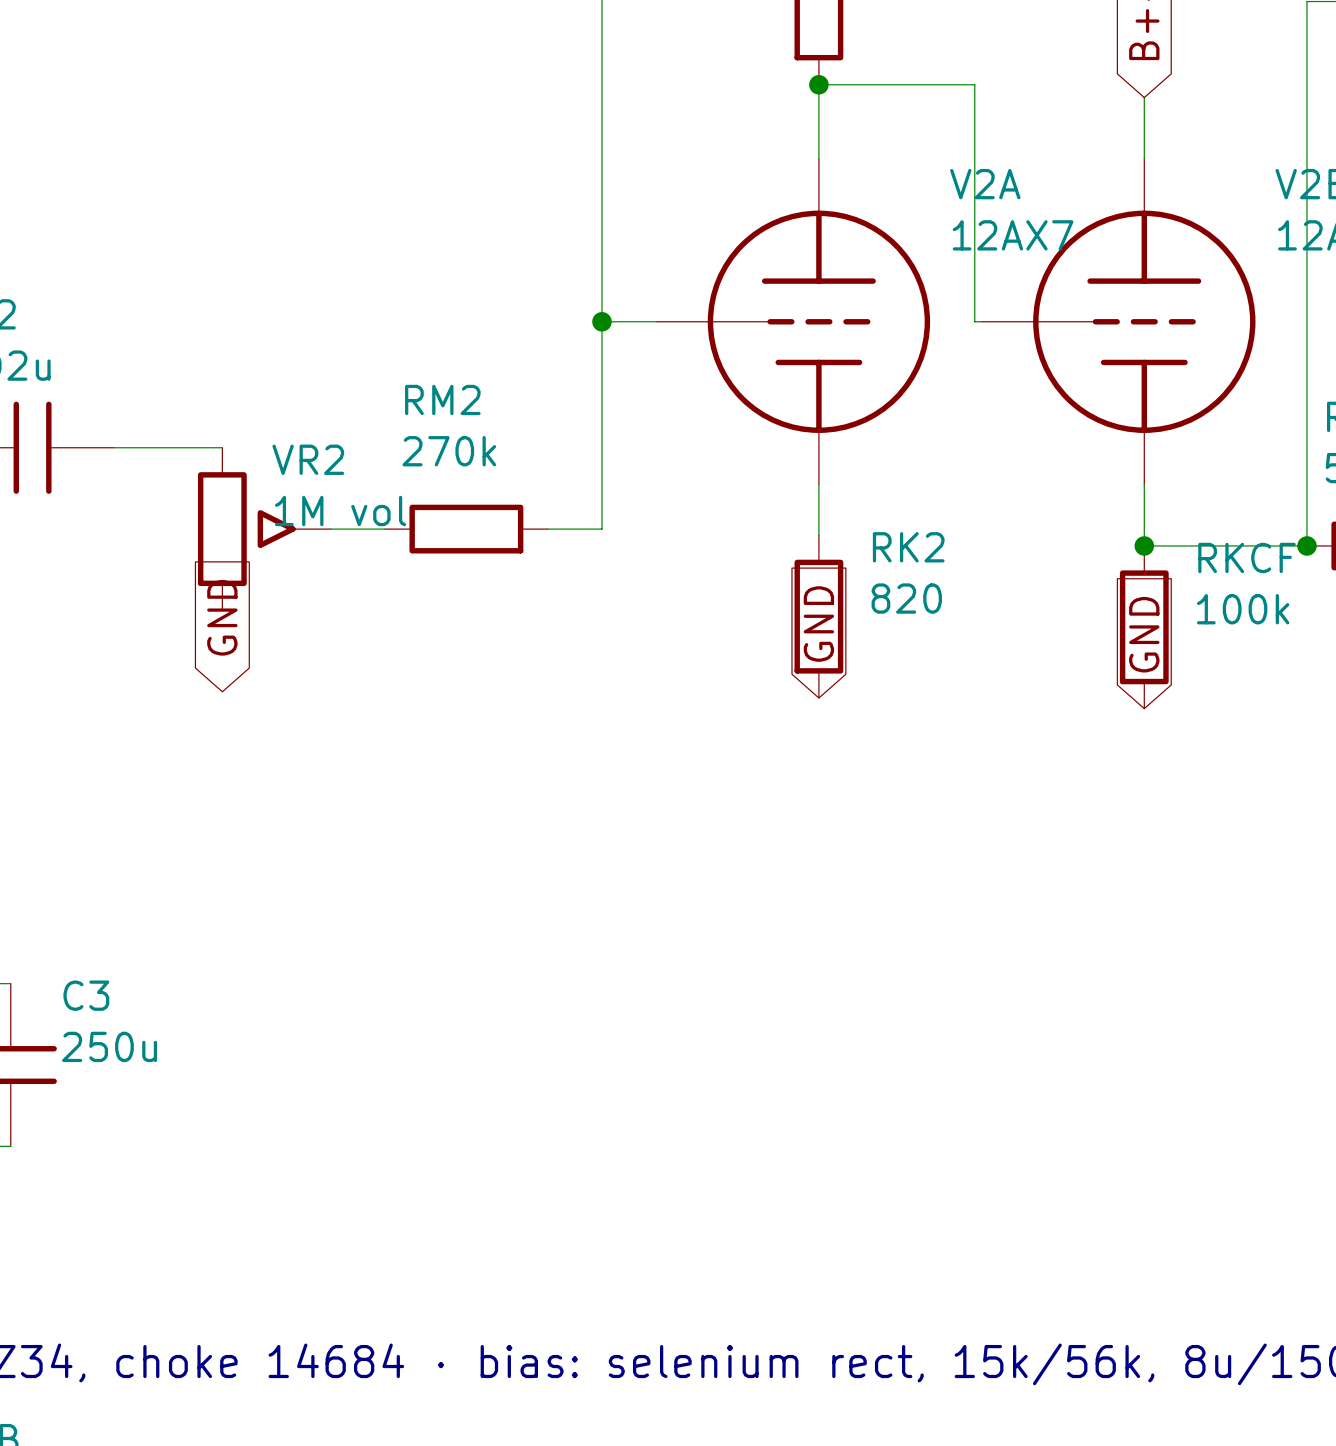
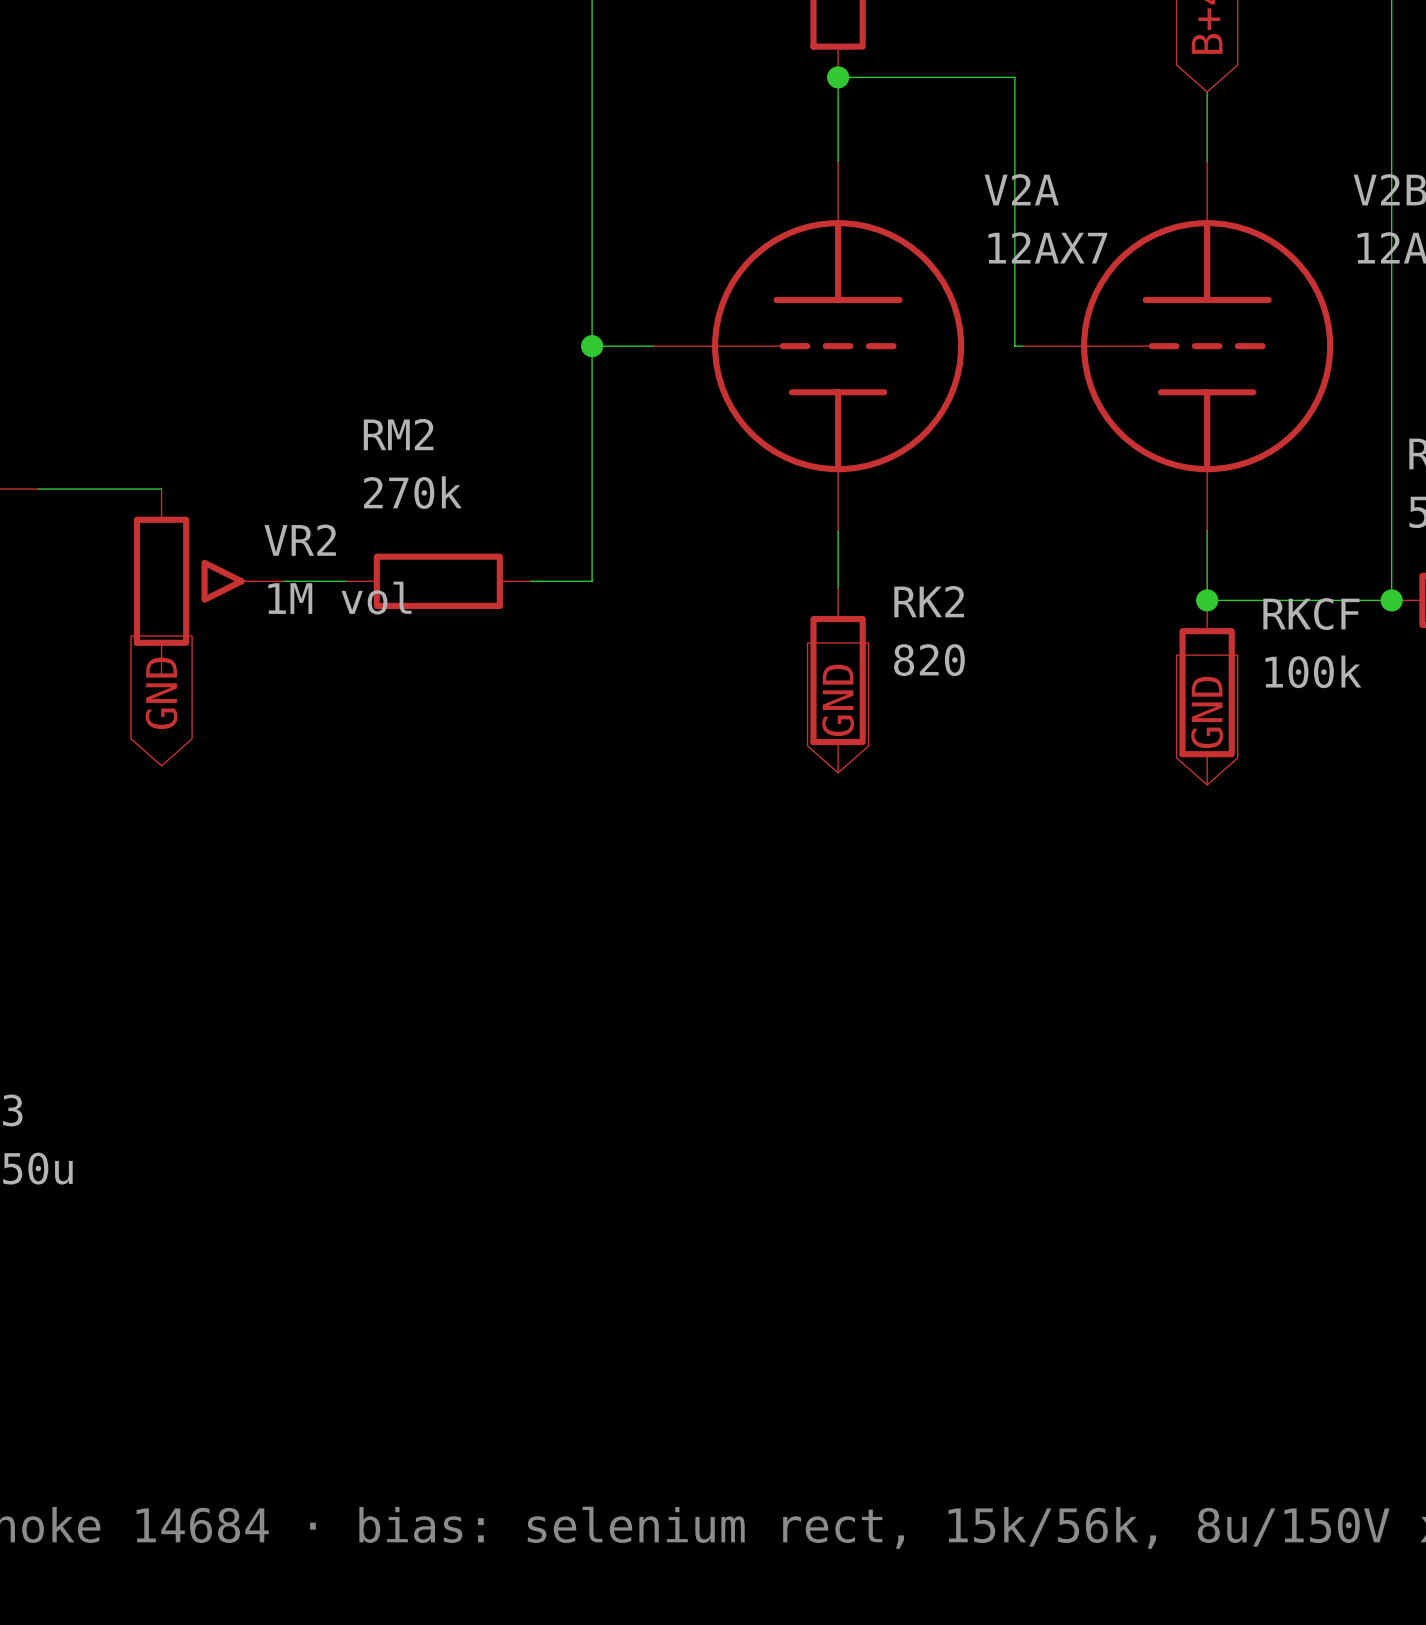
VR2 name position: VR2 (308, 459) -> VR2 (300, 540)
VR2 value position: 1M vol (340, 511) -> 1M vol (339, 598)

